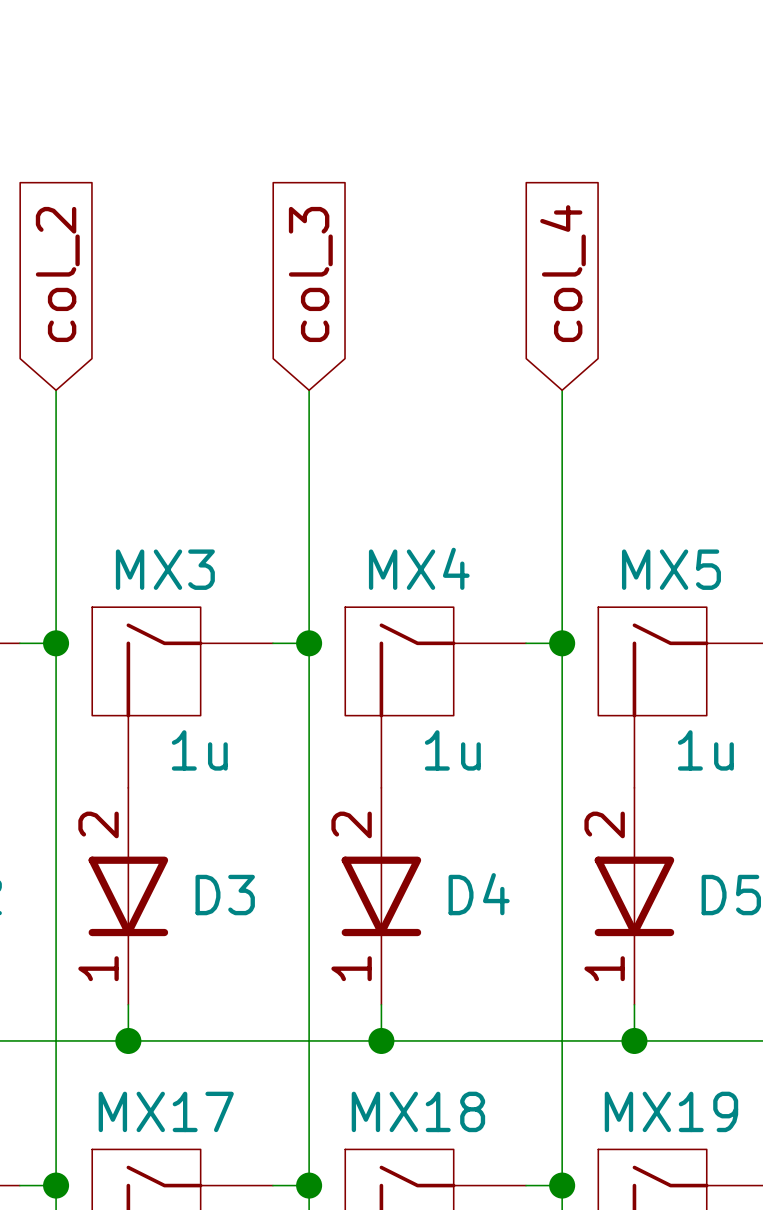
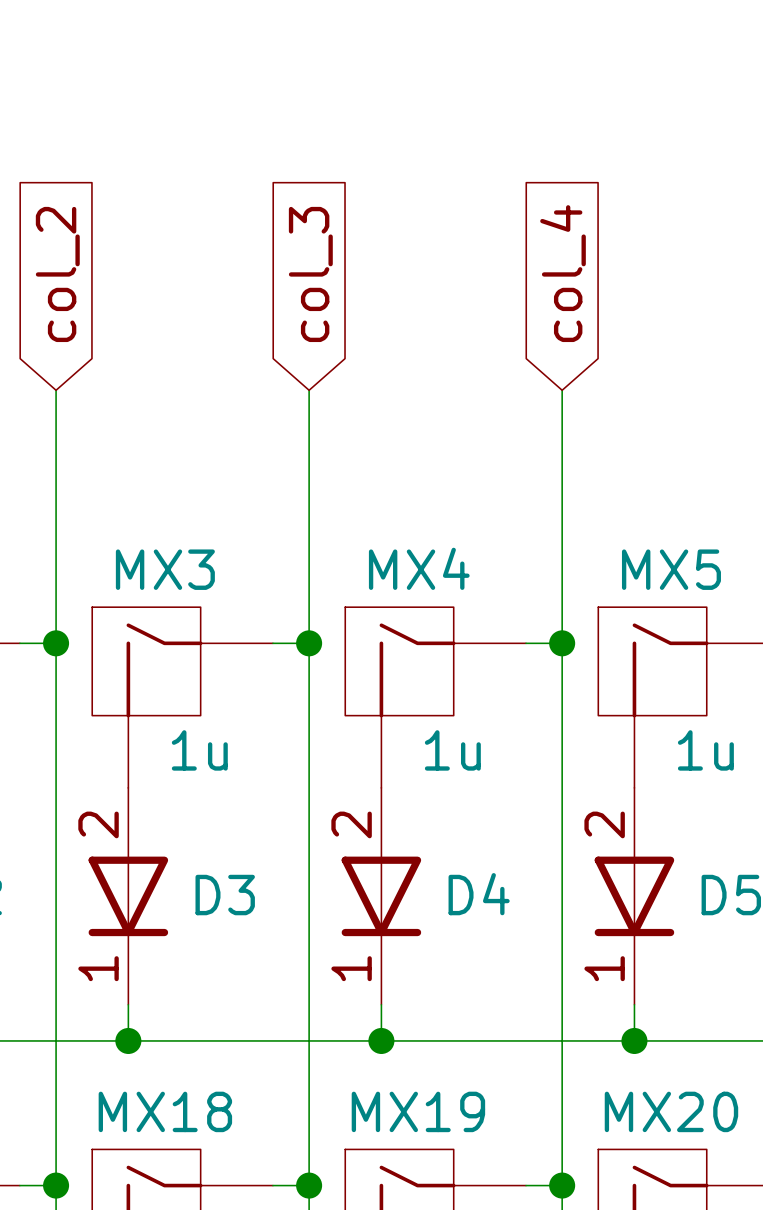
MX17 name: MX17 (166, 1111) -> MX18 (165, 1111)
MX18 name: MX18 (418, 1111) -> MX19 (418, 1111)
MX19 name: MX19 (671, 1111) -> MX20 (671, 1111)

